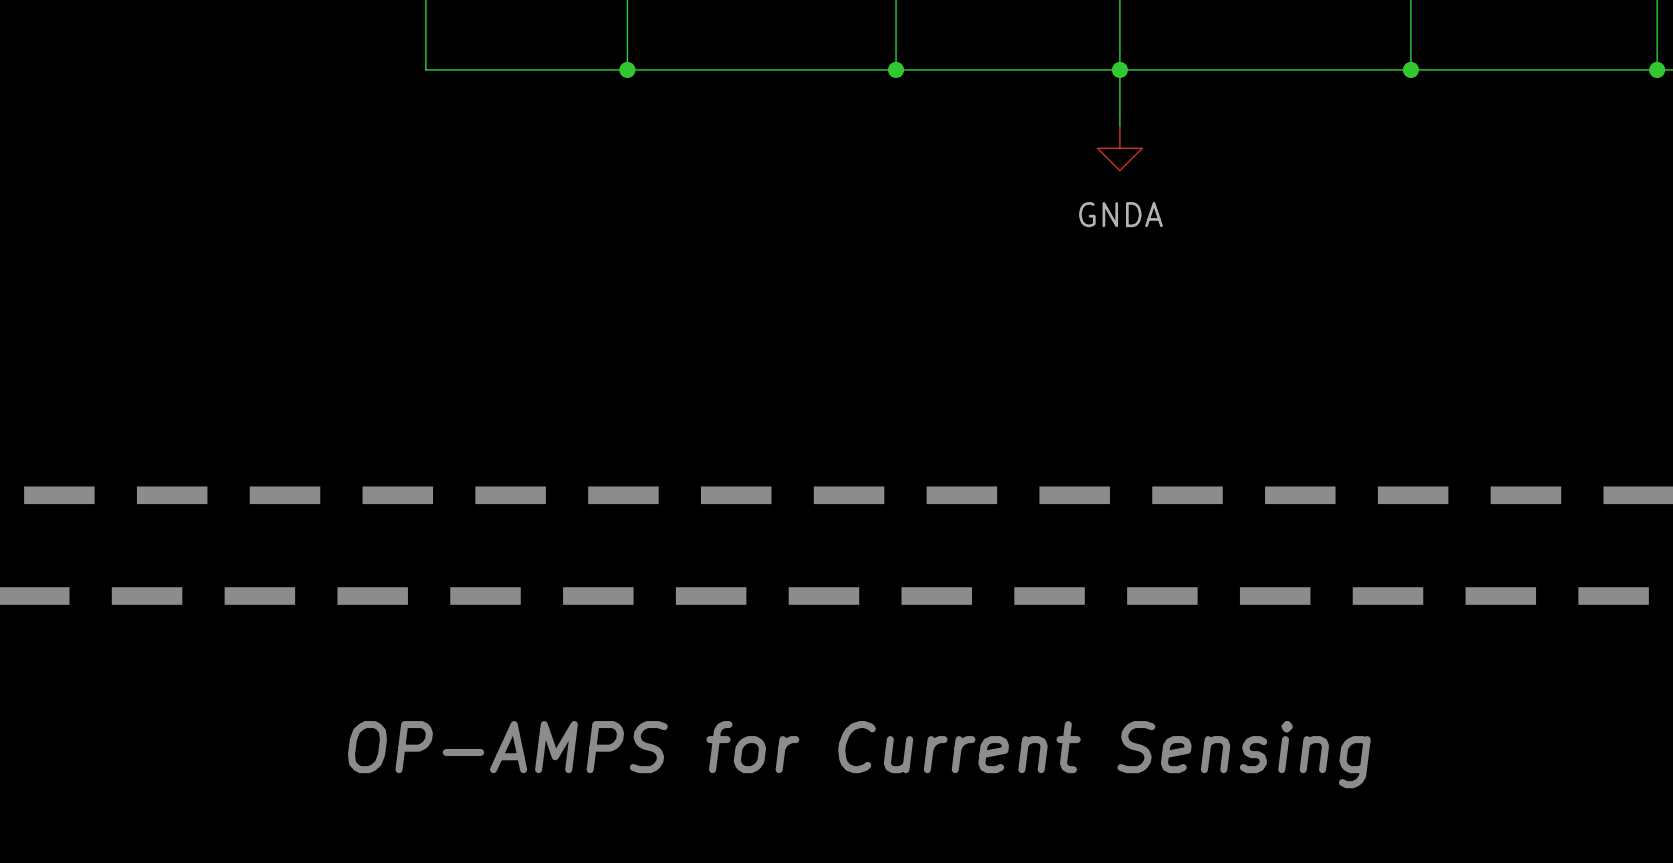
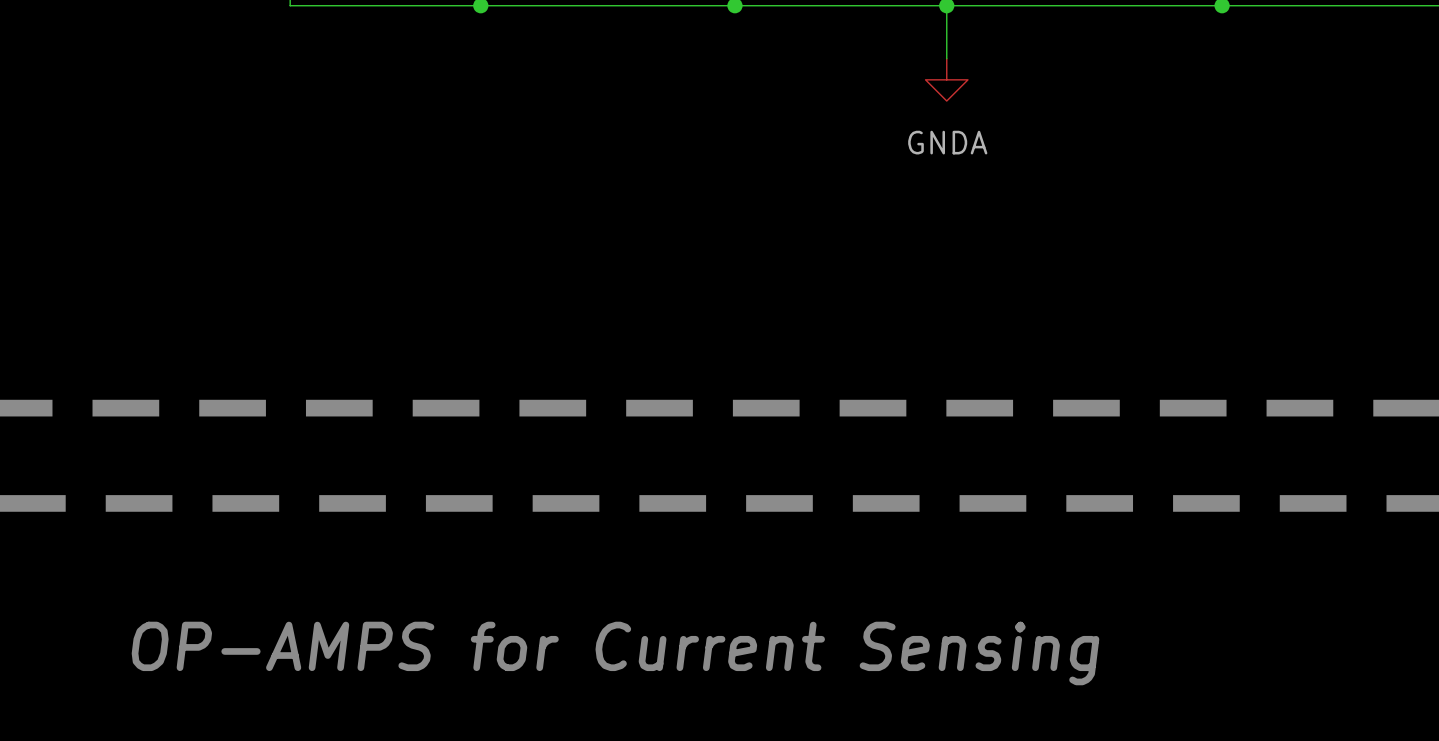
text position: OP-AMPS for Current Sensing (859, 754) -> OP-AMPS for Current Sensing (615, 653)

